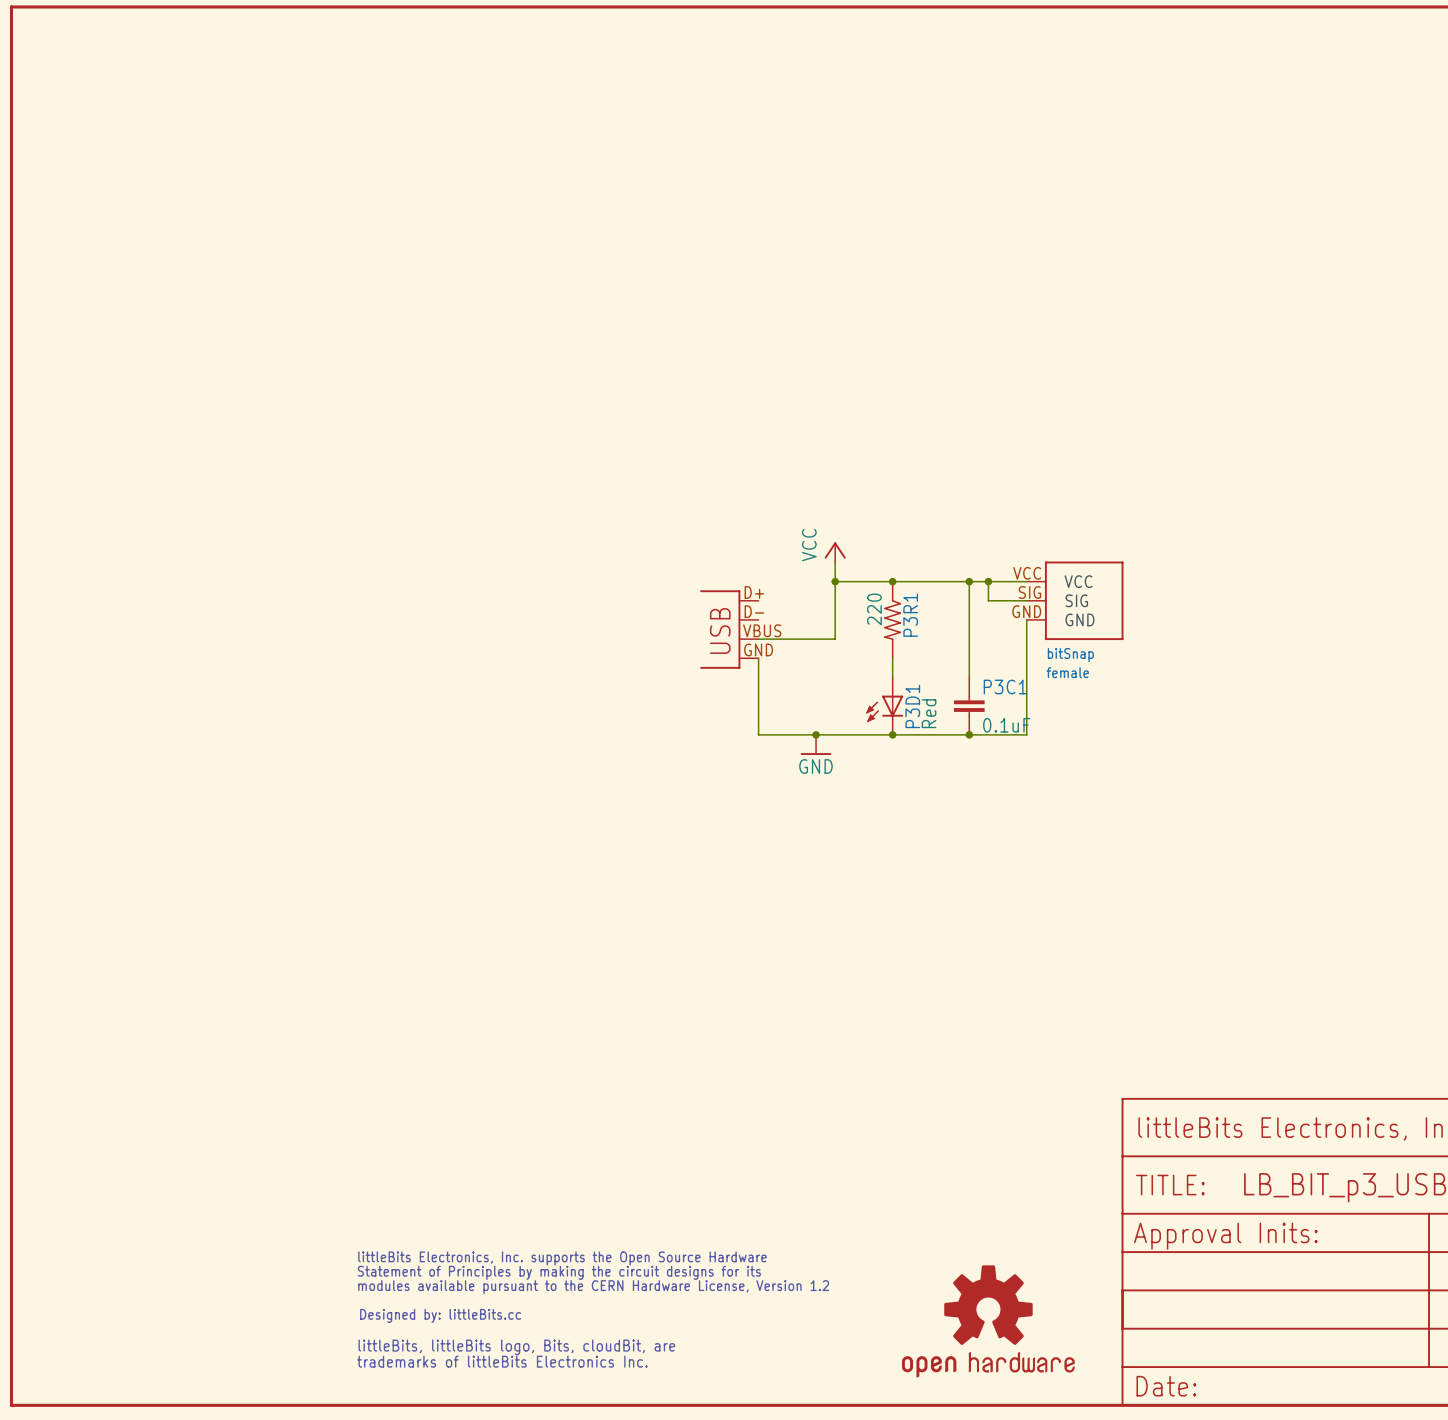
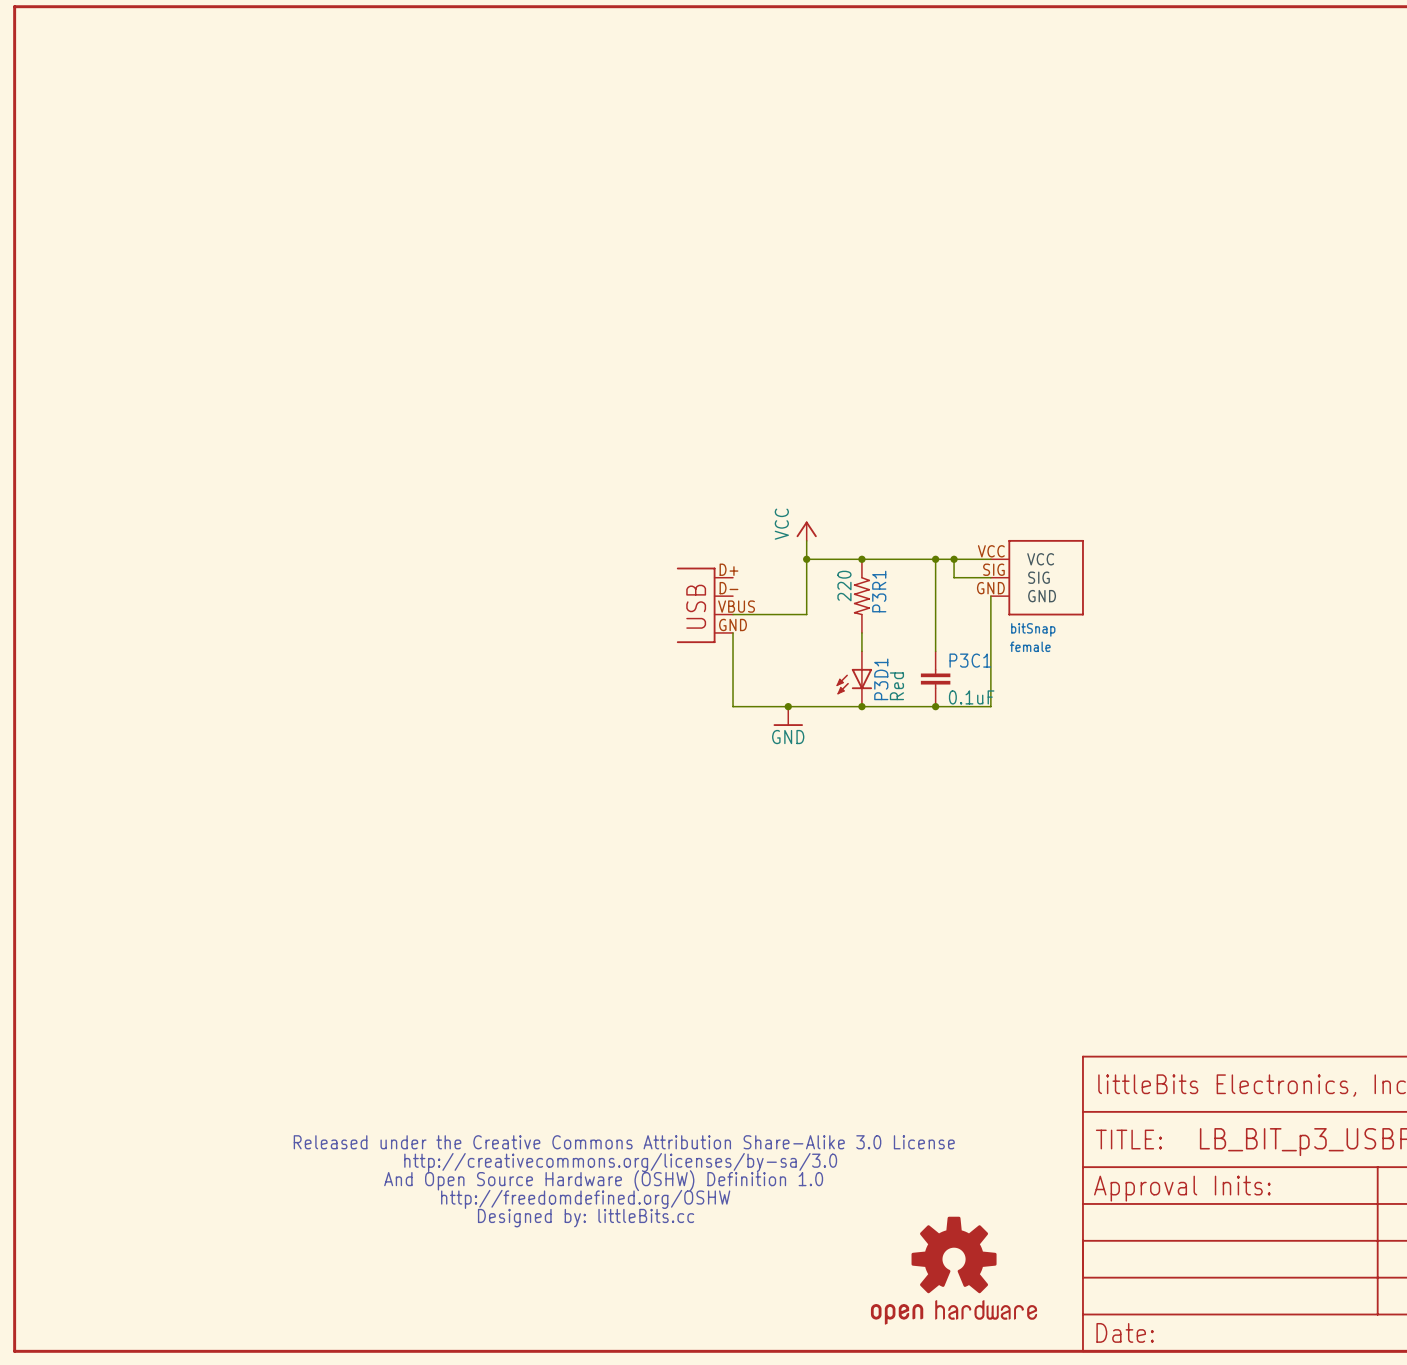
part: none -> (624, 1181)
part: (593, 1309) -> none

